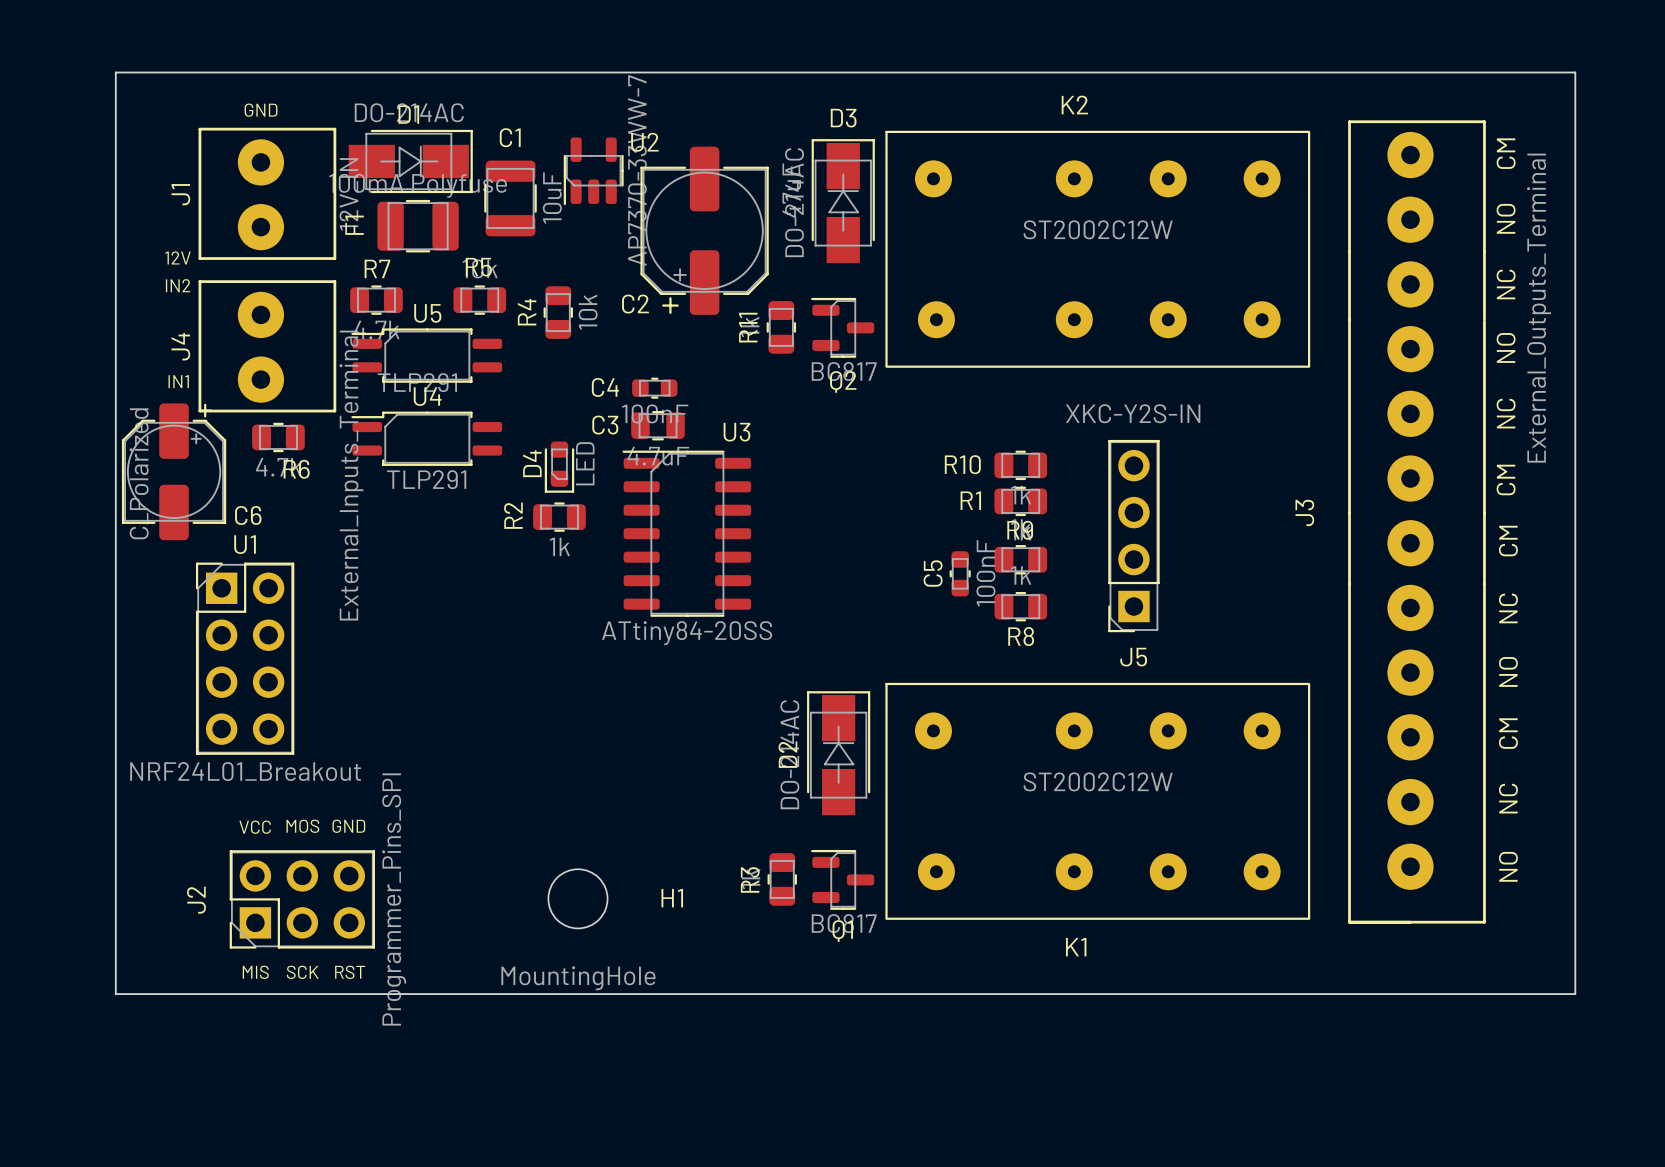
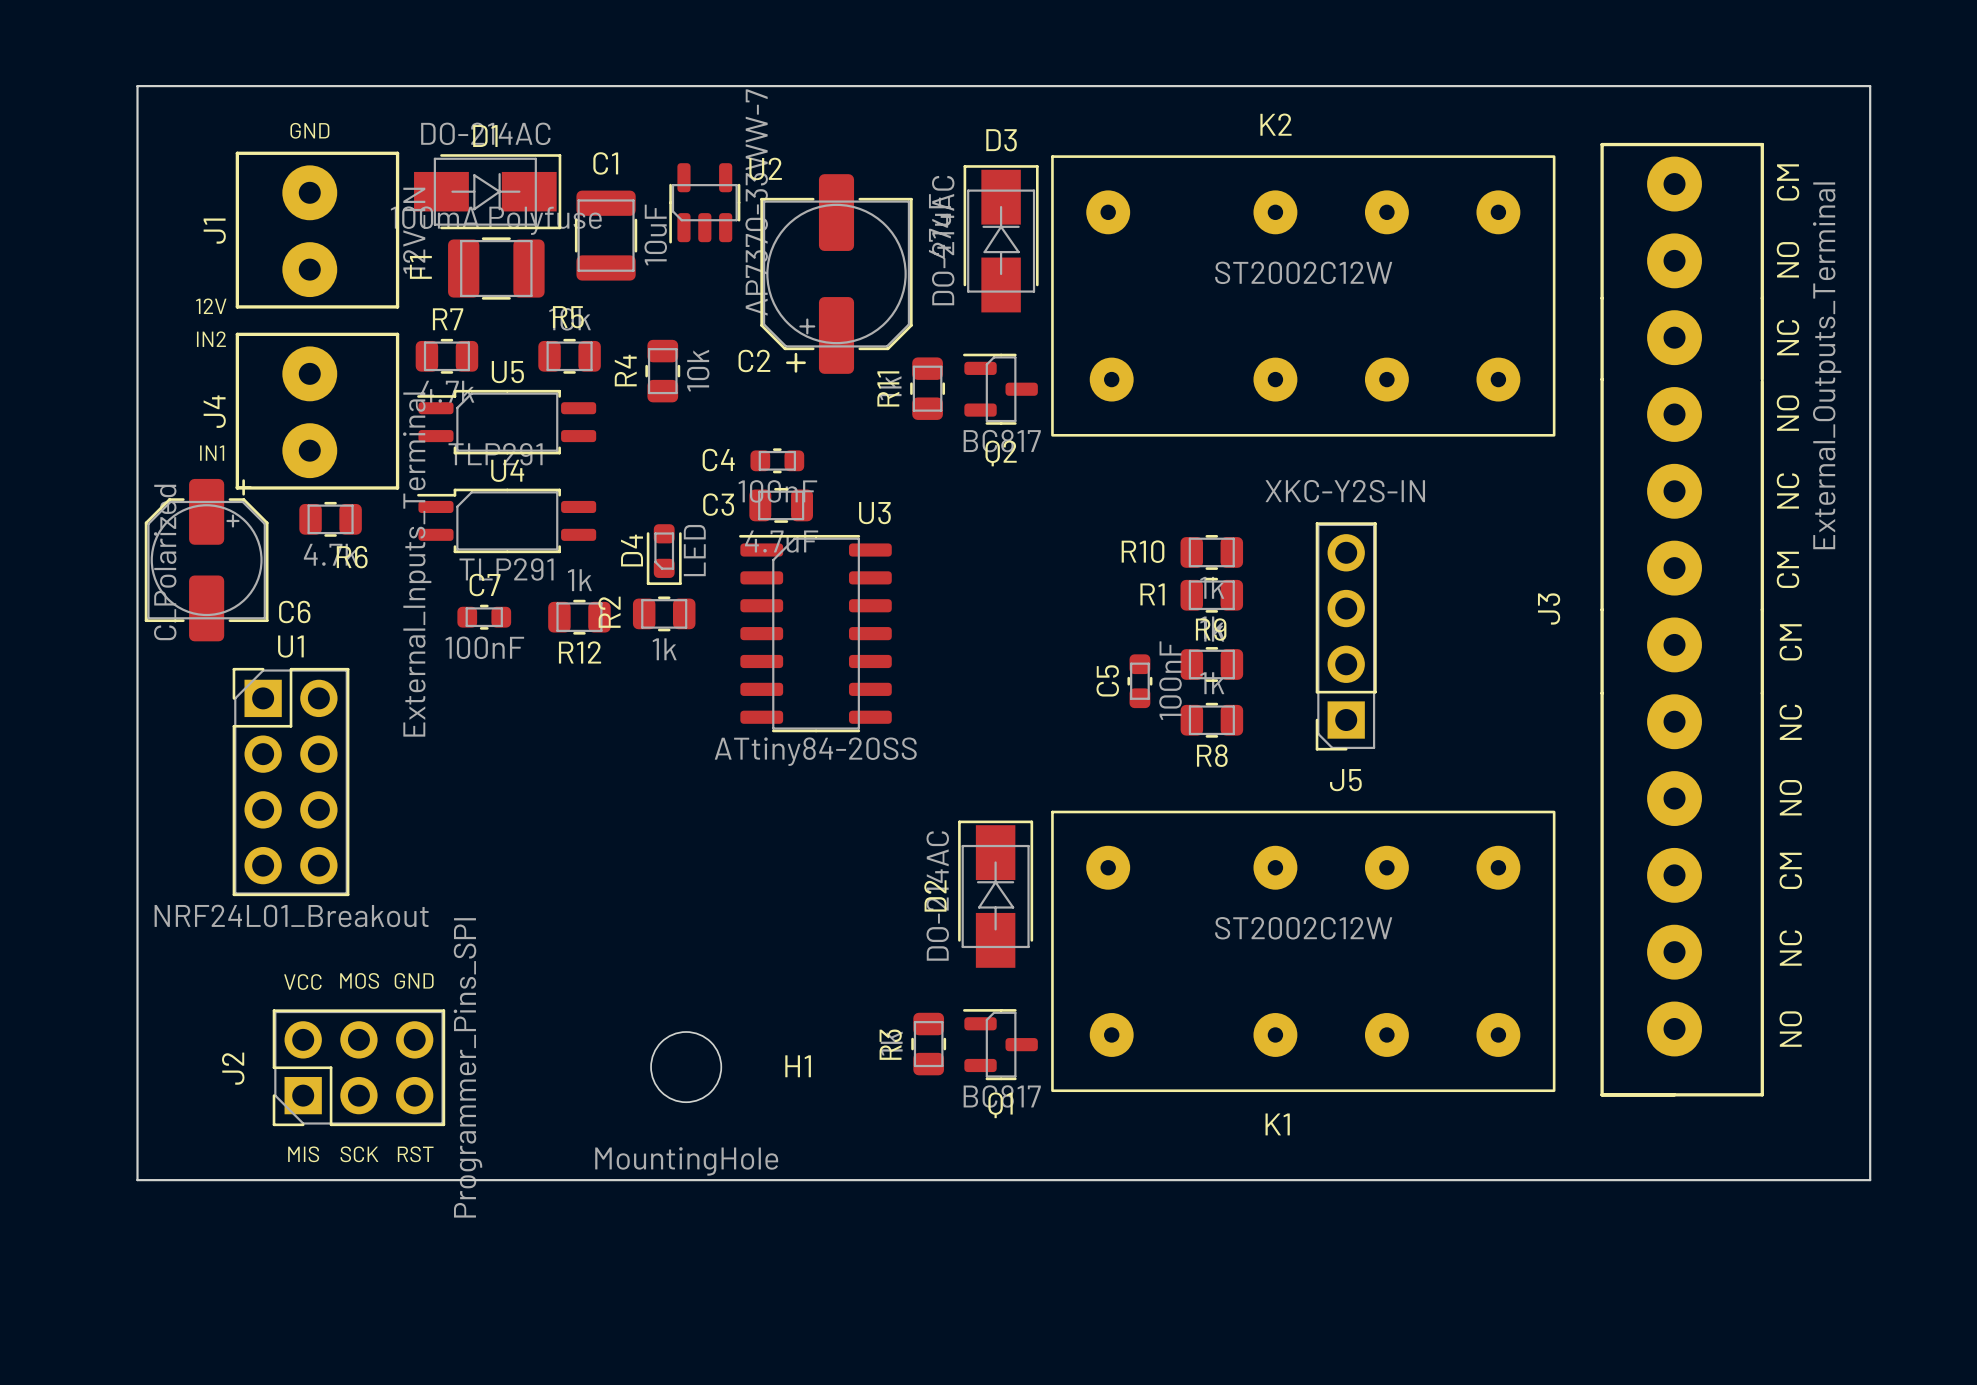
C7: none -> 100nF (484, 617)
R12: none -> 1k (579, 617)

